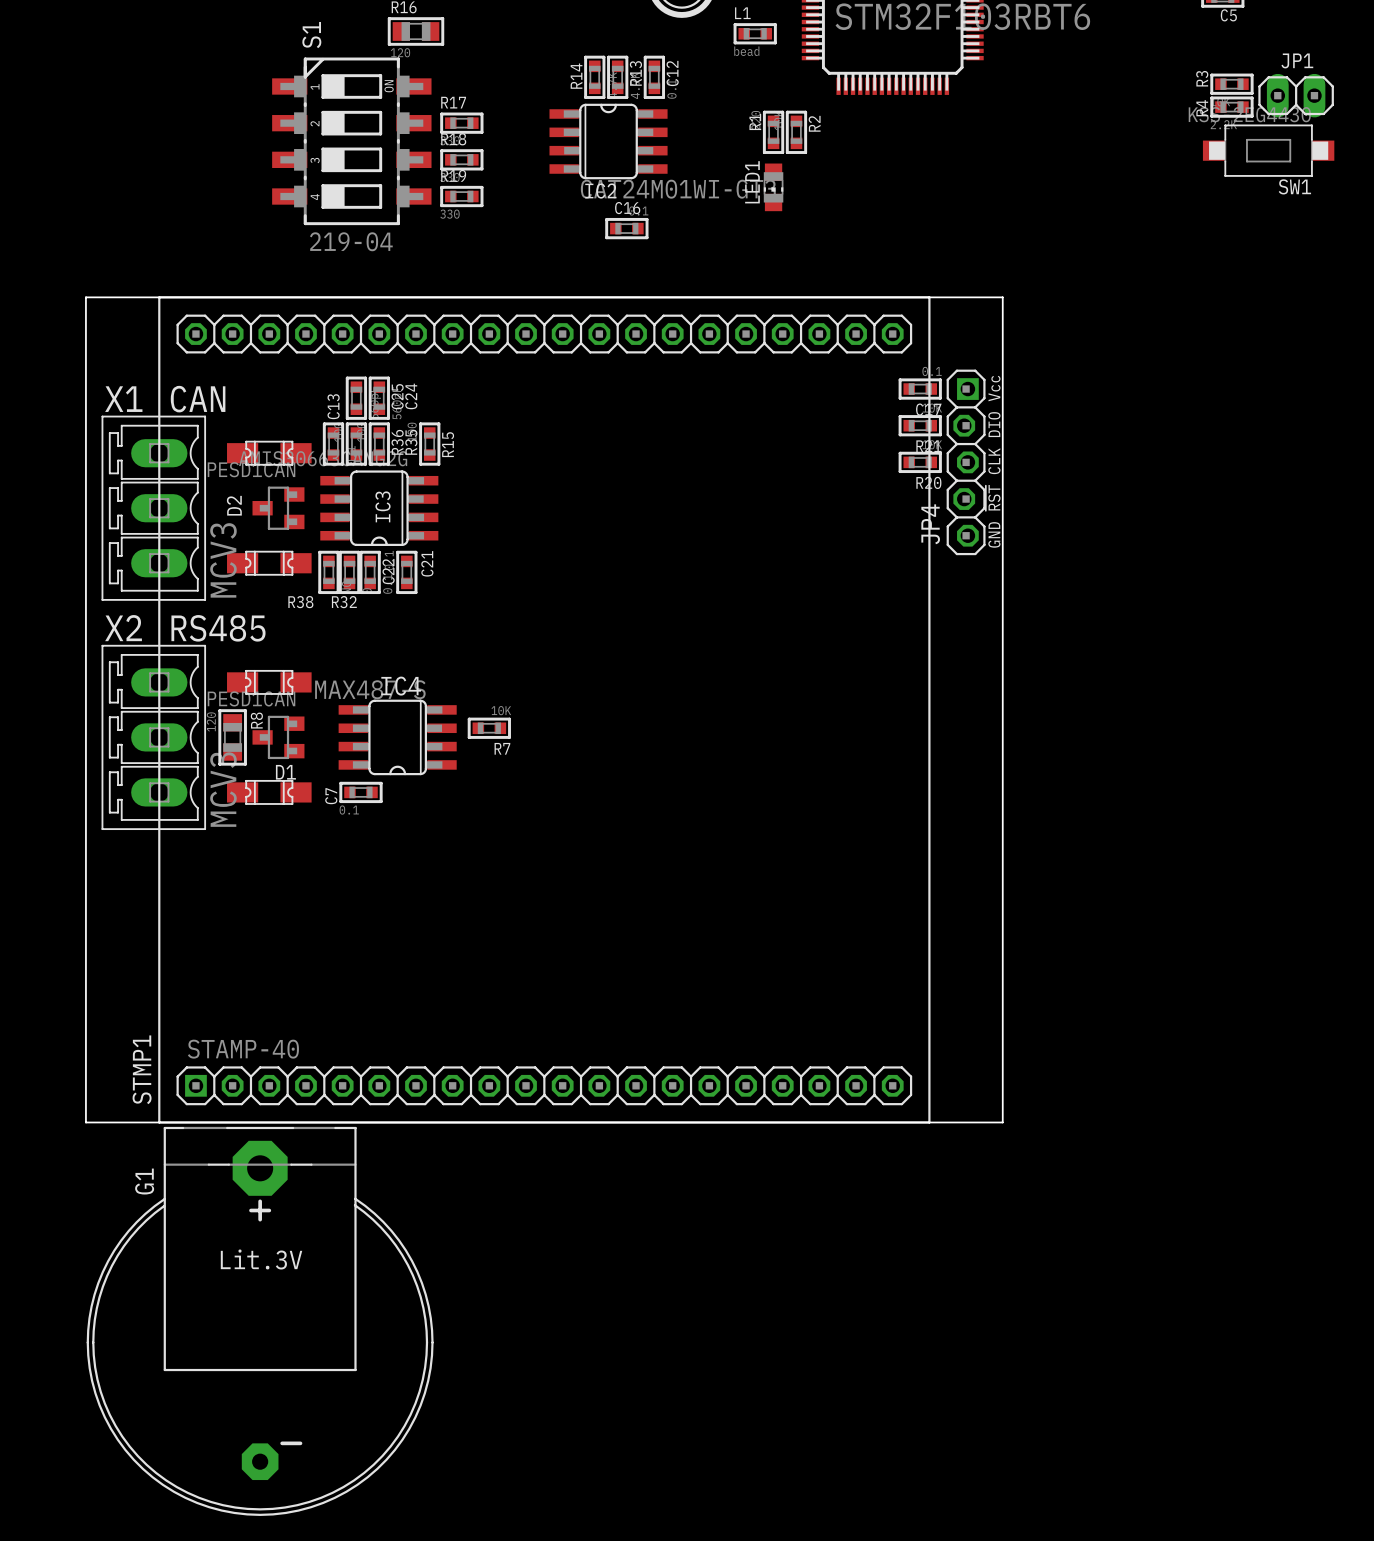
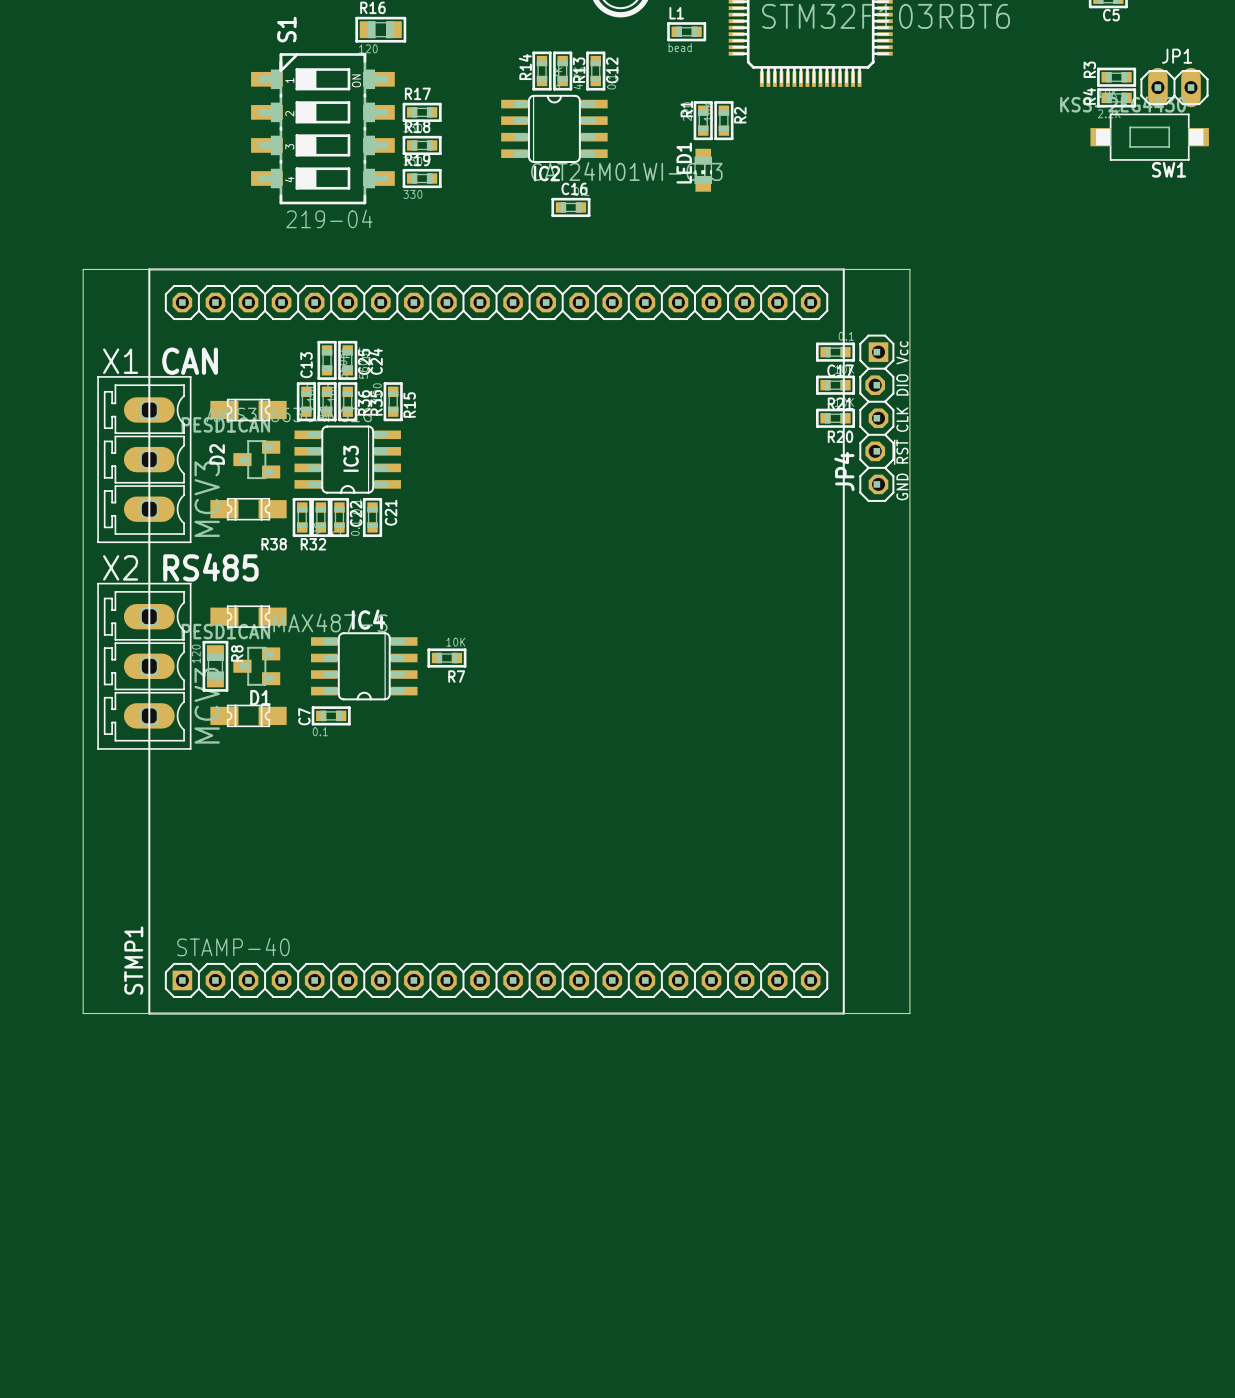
G1: (260, 1321) -> none

